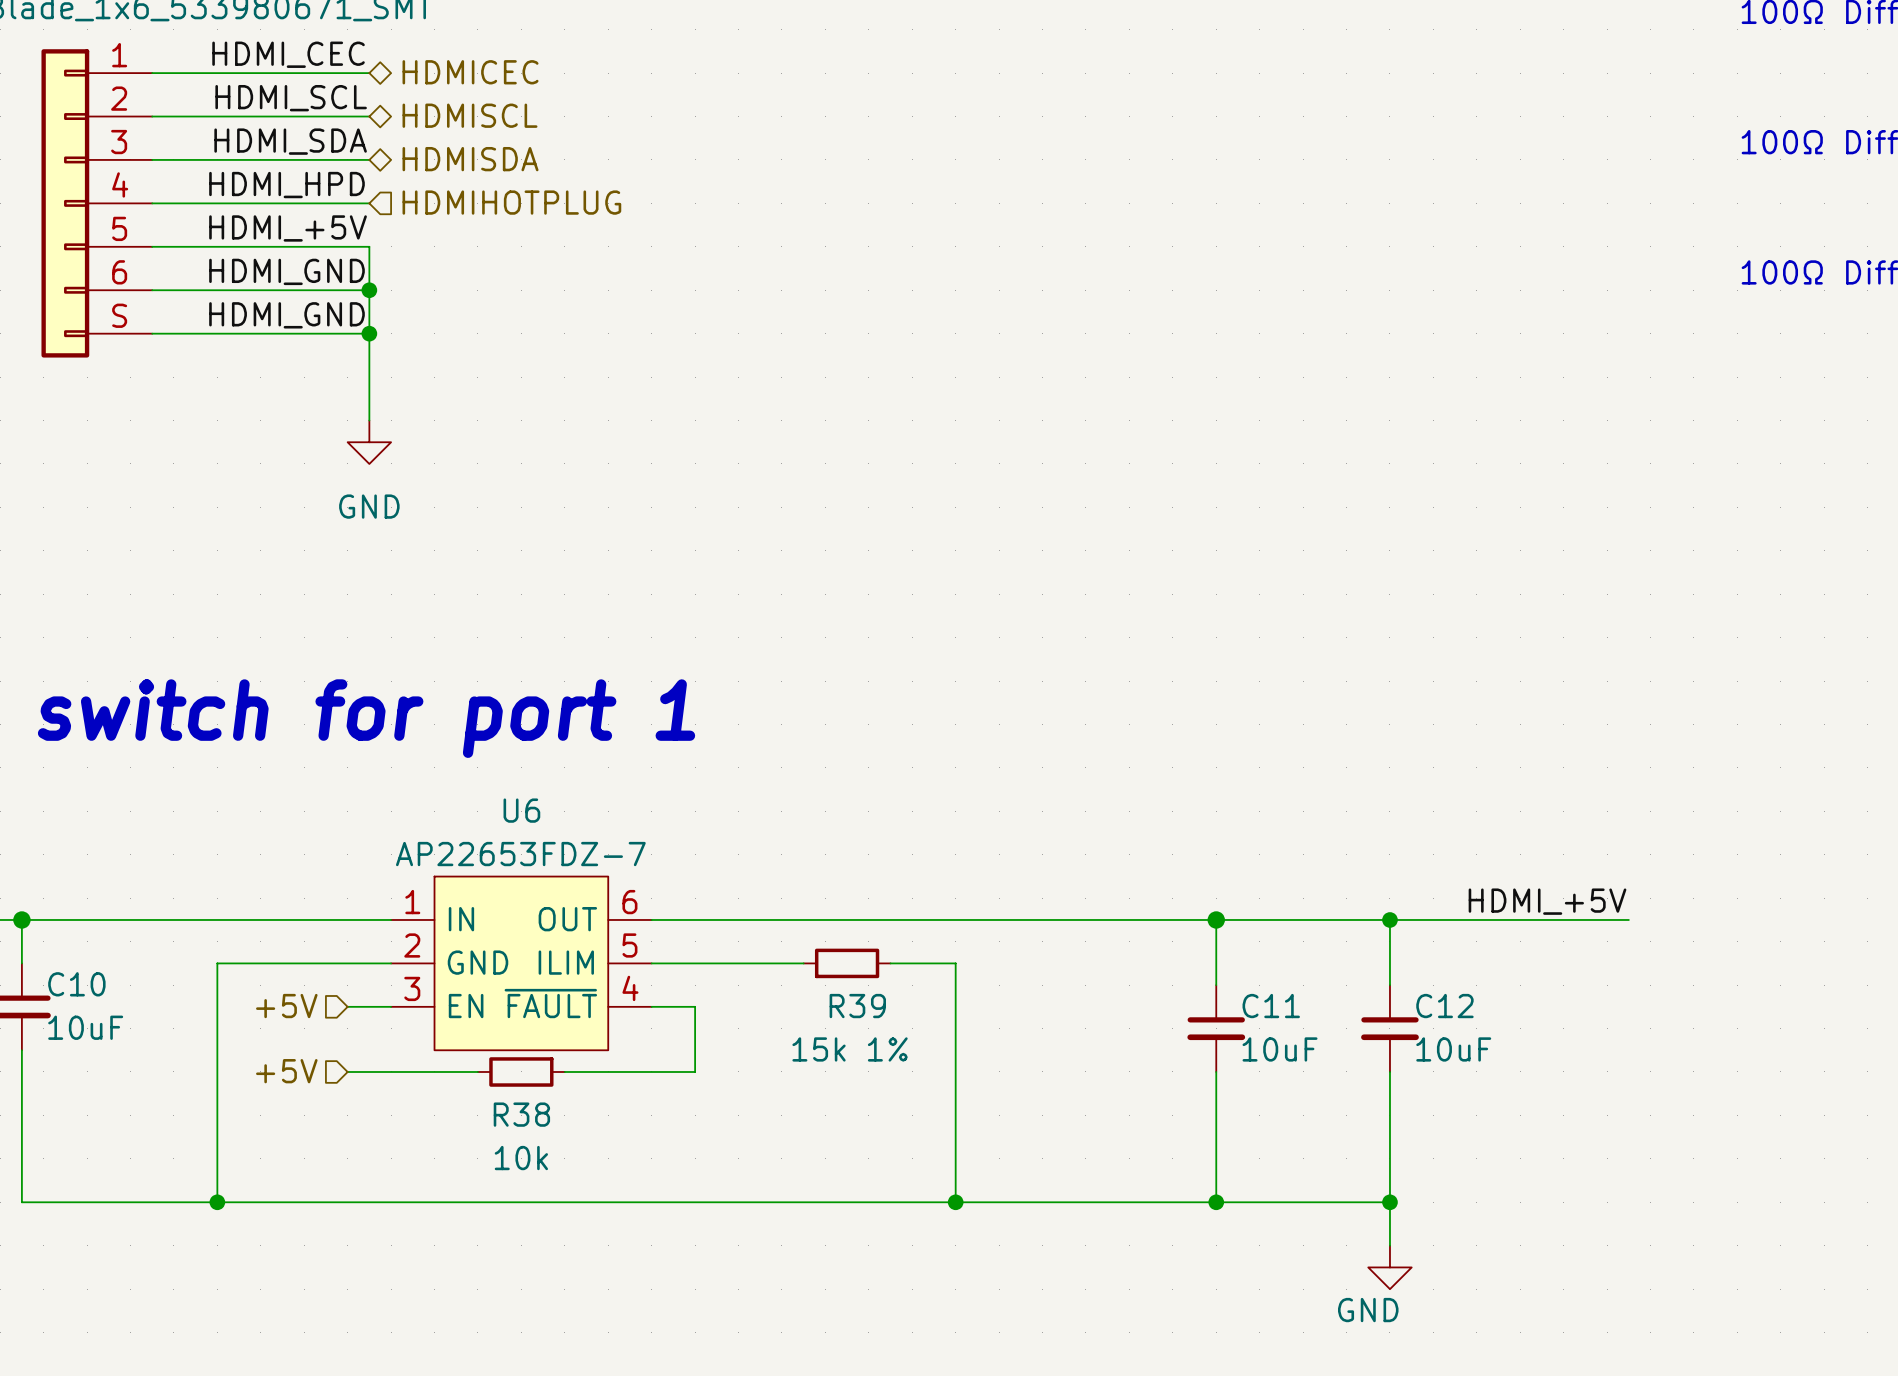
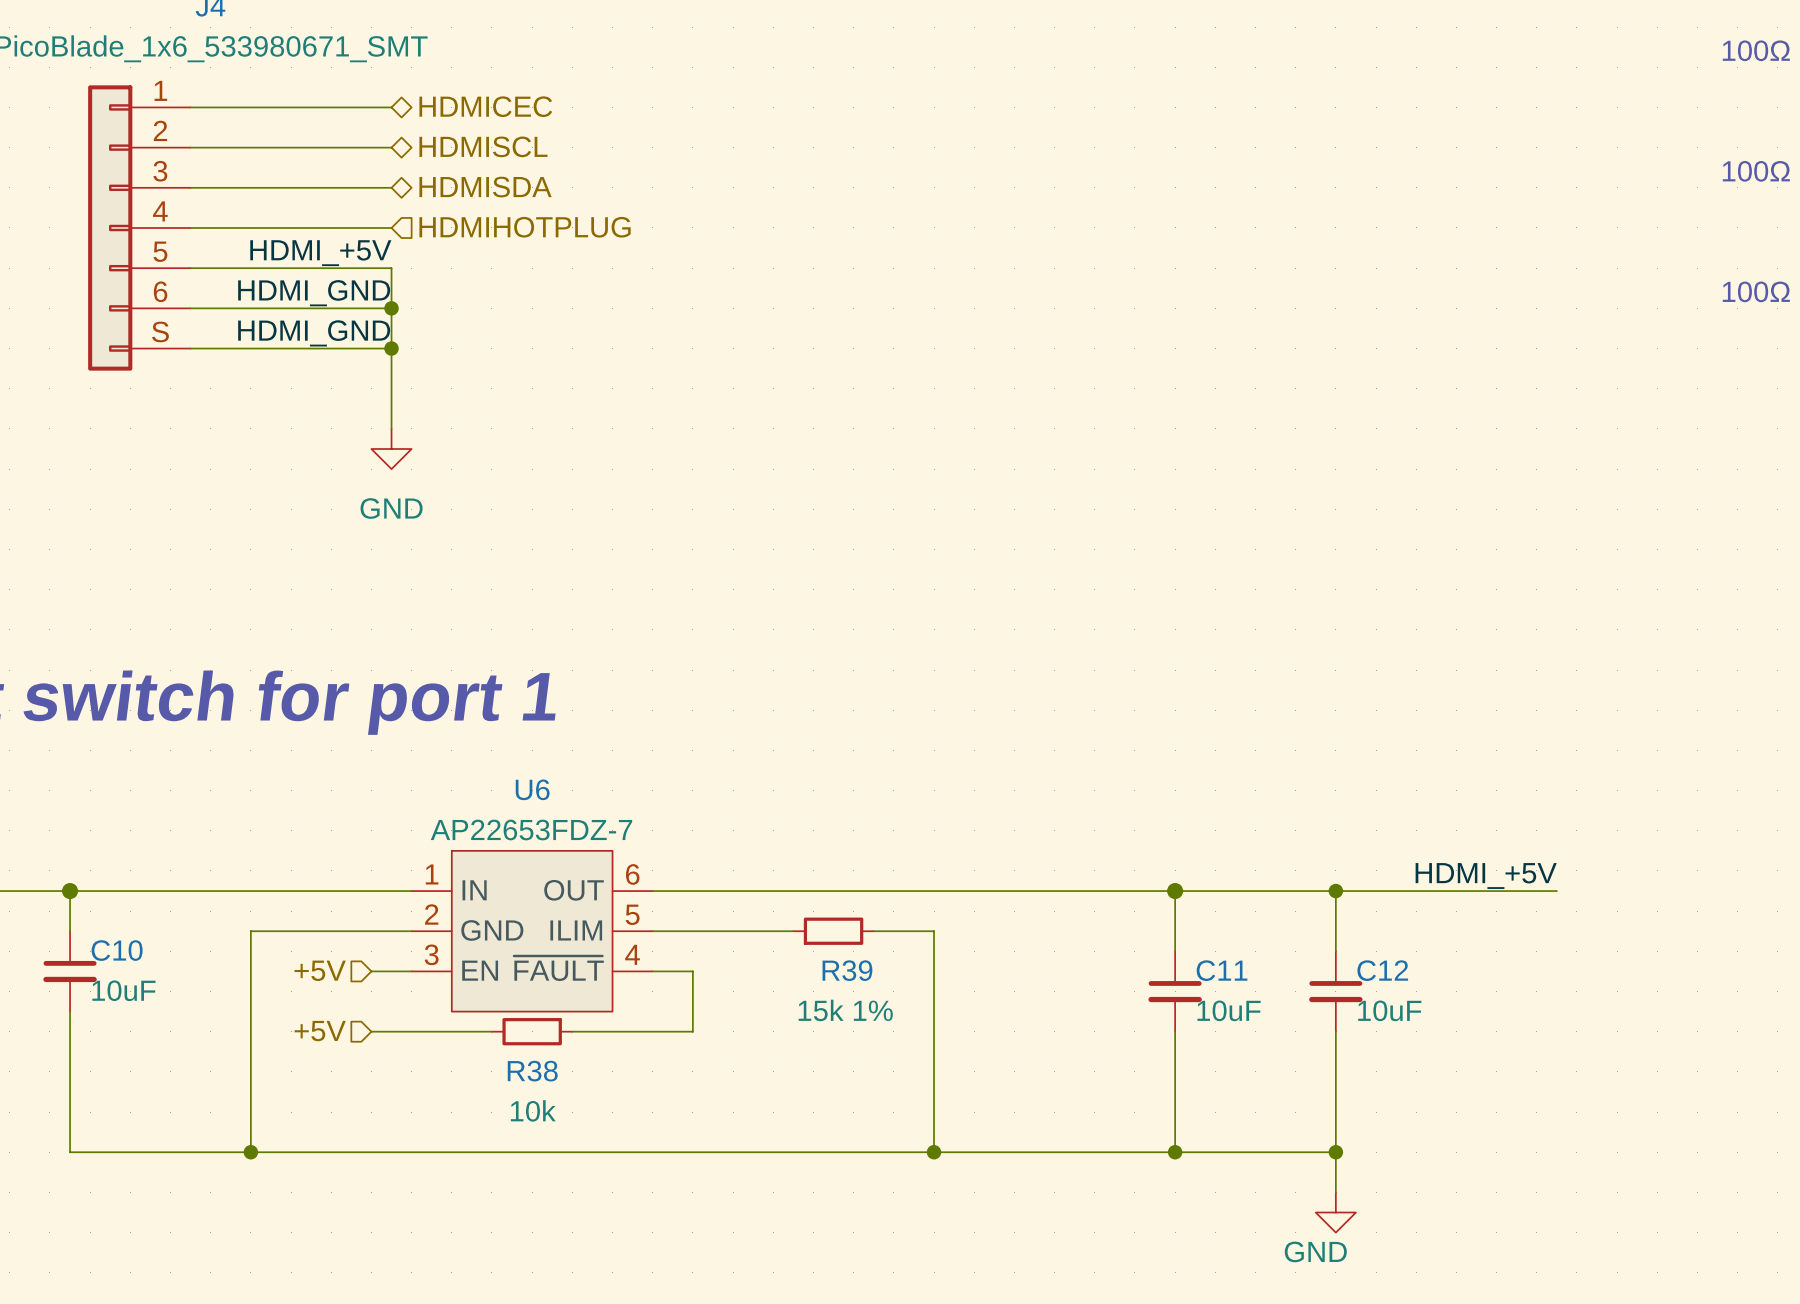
label: HDMI_CEC (288, 54) -> none
label: HDMI_SCL (291, 98) -> none
label: HDMI_SDA (290, 141) -> none
label: HDMI_HPD (286, 185) -> none

